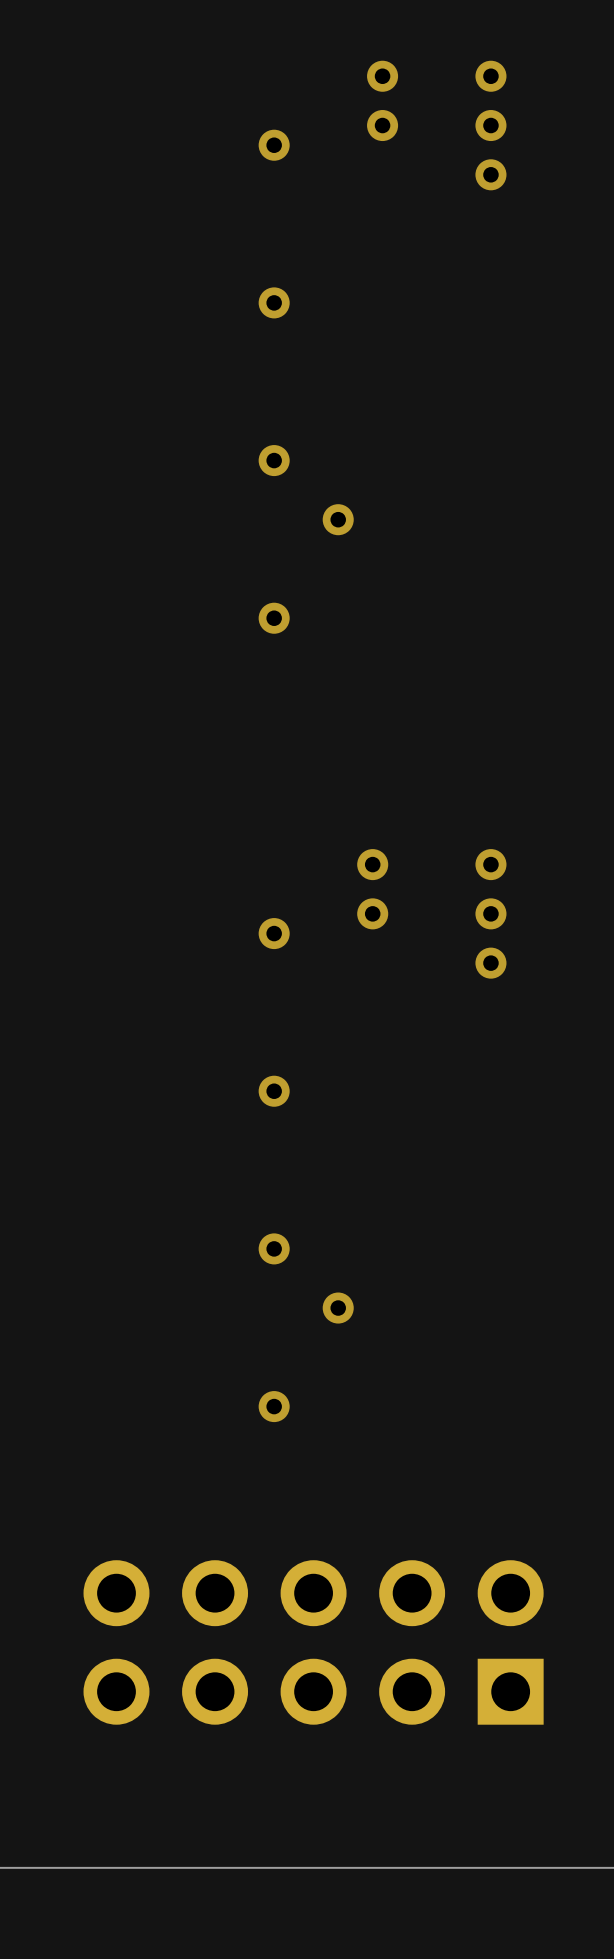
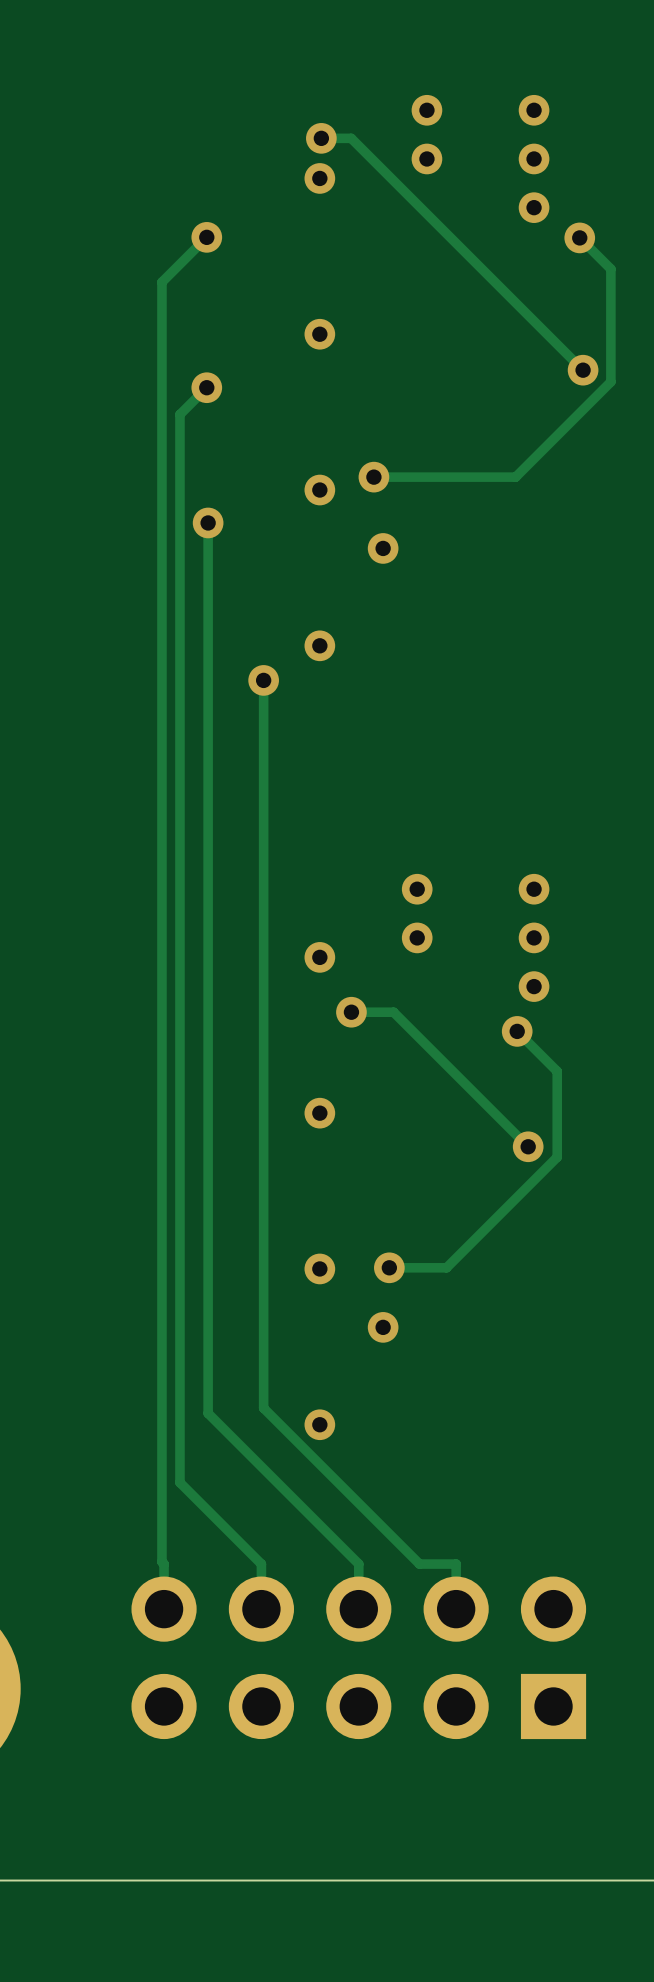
track: none -> (321, 138) (351, 138) (583, 370)
via: none -> (321, 138)
track: none -> (206, 237) (161, 282) (161, 1561) (164, 1564) (164, 1609)
via: none -> (206, 237)
track: none -> (579, 237) (610, 269) (610, 381) (515, 477) (373, 477)
via: none -> (579, 237)
via: none -> (583, 370)
track: none -> (206, 387) (179, 414) (179, 1482) (261, 1564) (261, 1609)
via: none -> (206, 387)
via: none -> (373, 477)
track: none -> (208, 522) (208, 1413) (358, 1564) (358, 1609)
via: none -> (208, 522)
track: none -> (263, 680) (263, 1408) (419, 1564) (456, 1564) (456, 1609)
via: none -> (263, 680)
track: none -> (351, 1012) (393, 1012) (528, 1146)
via: none -> (351, 1012)
track: none -> (517, 1031) (557, 1071) (557, 1157) (446, 1267) (389, 1267)
via: none -> (517, 1031)
via: none -> (528, 1146)
via: none -> (389, 1267)

